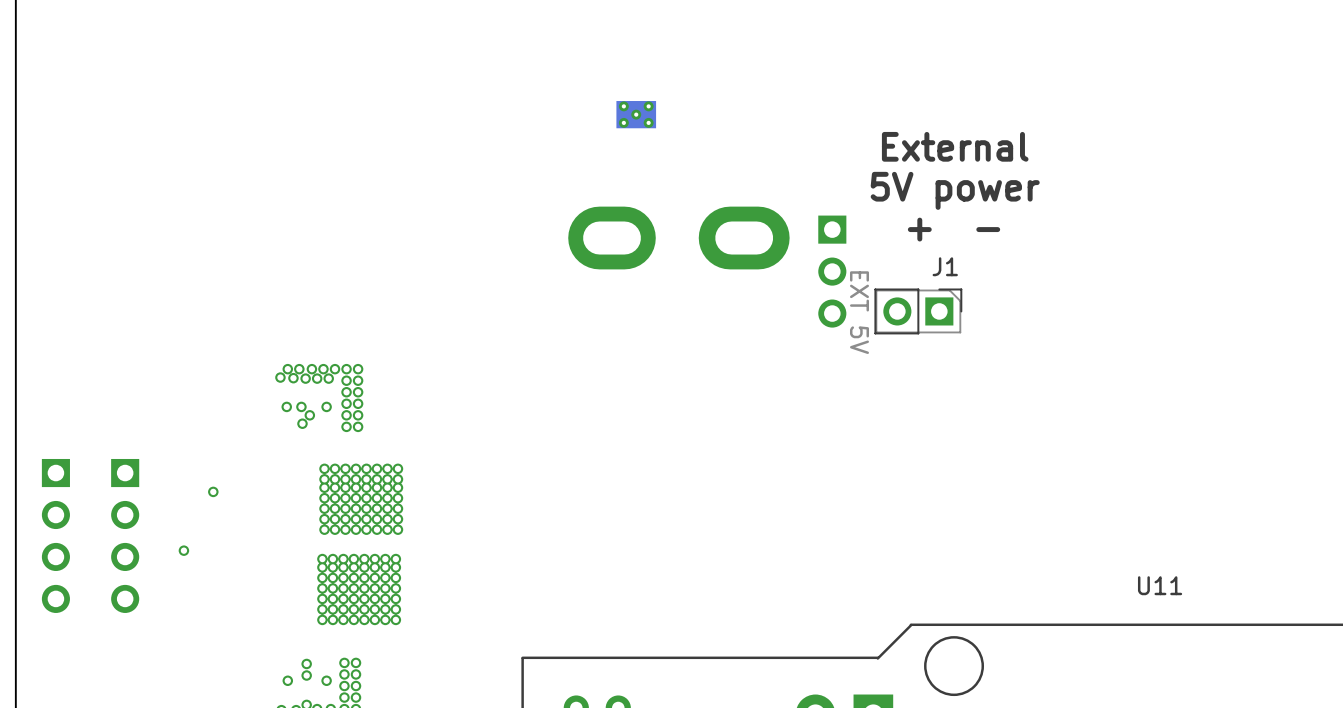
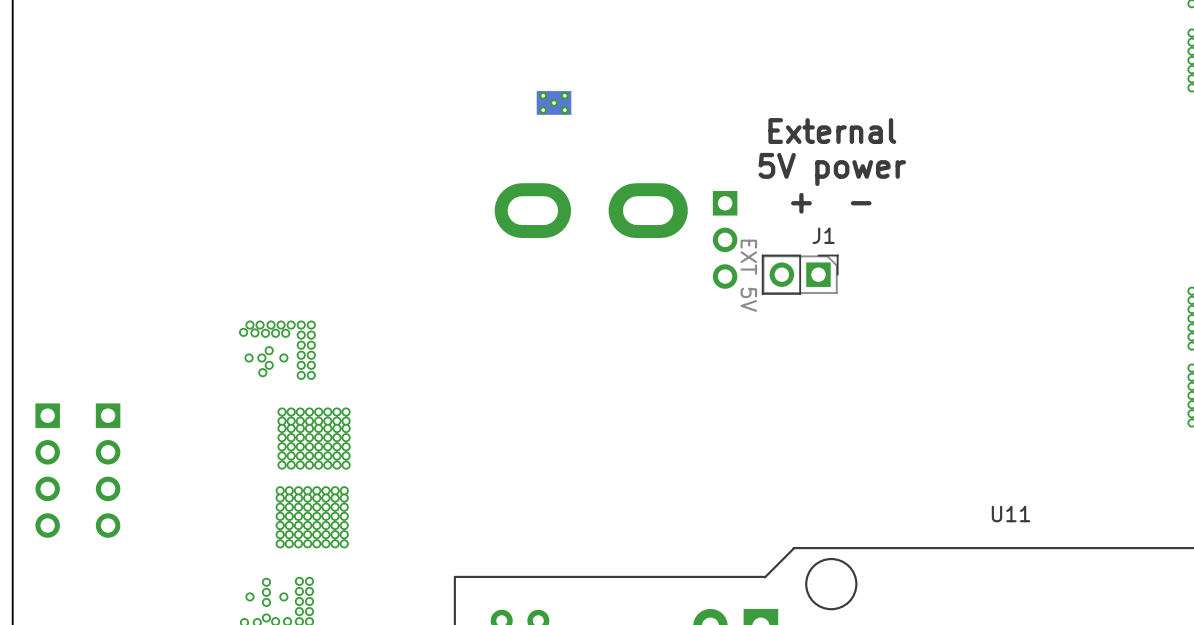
via: none -> (269, 350)
via: (213, 491) -> none
via: (183, 550) -> none
via: none -> (266, 602)

